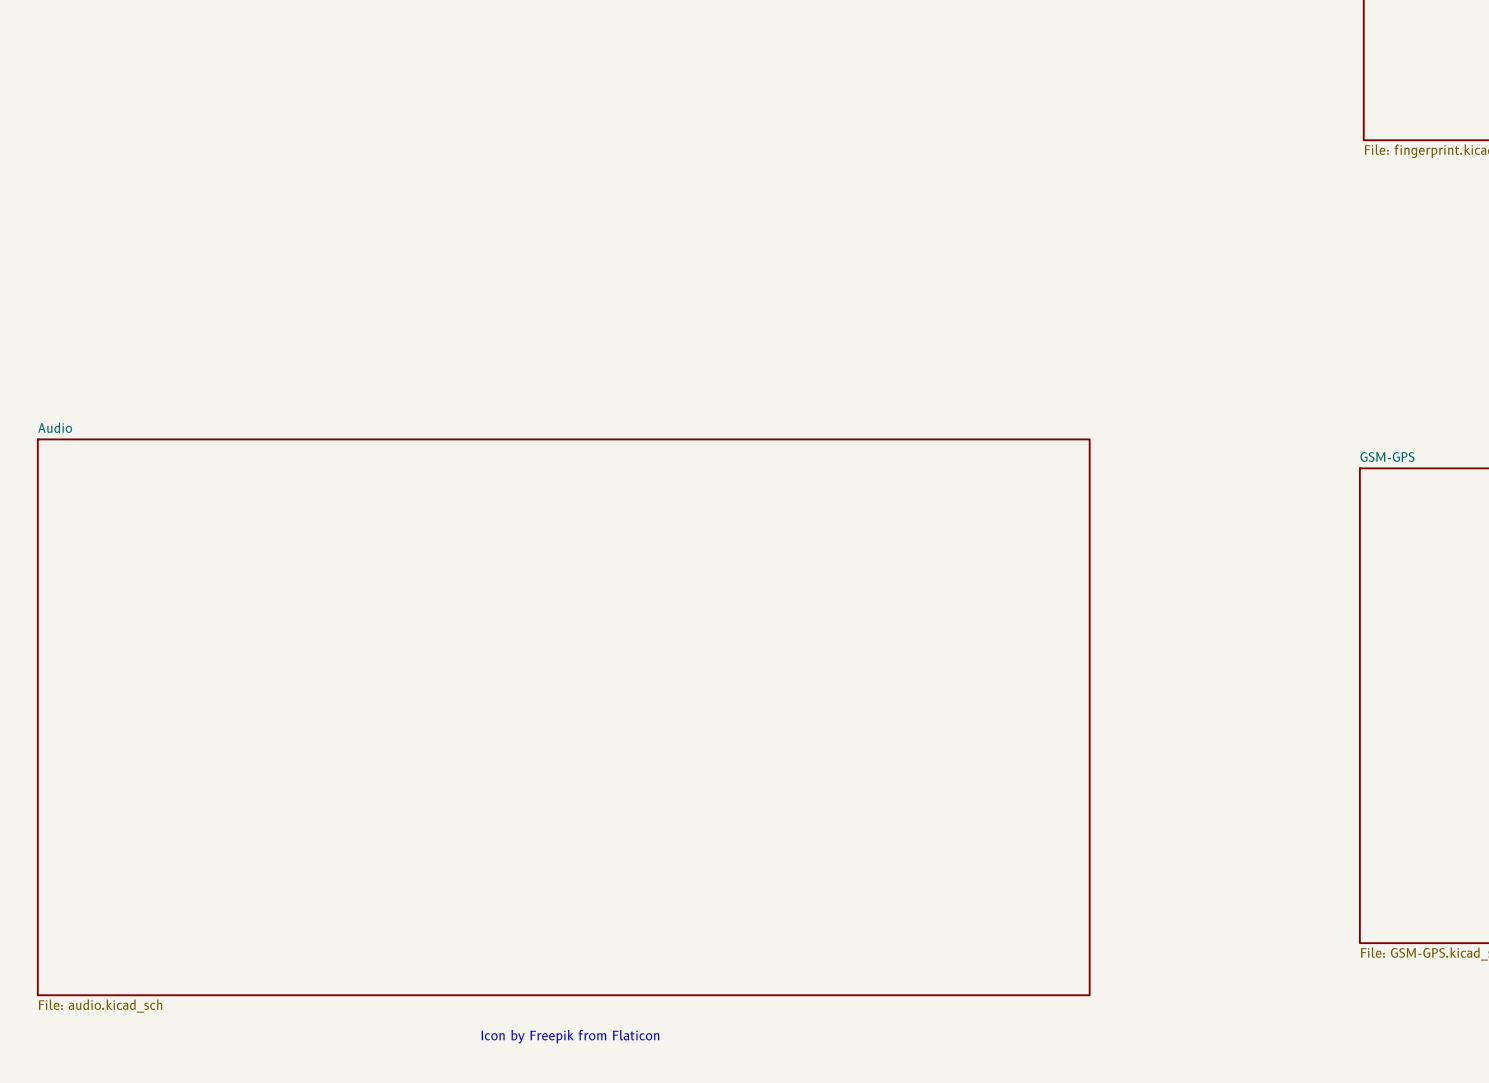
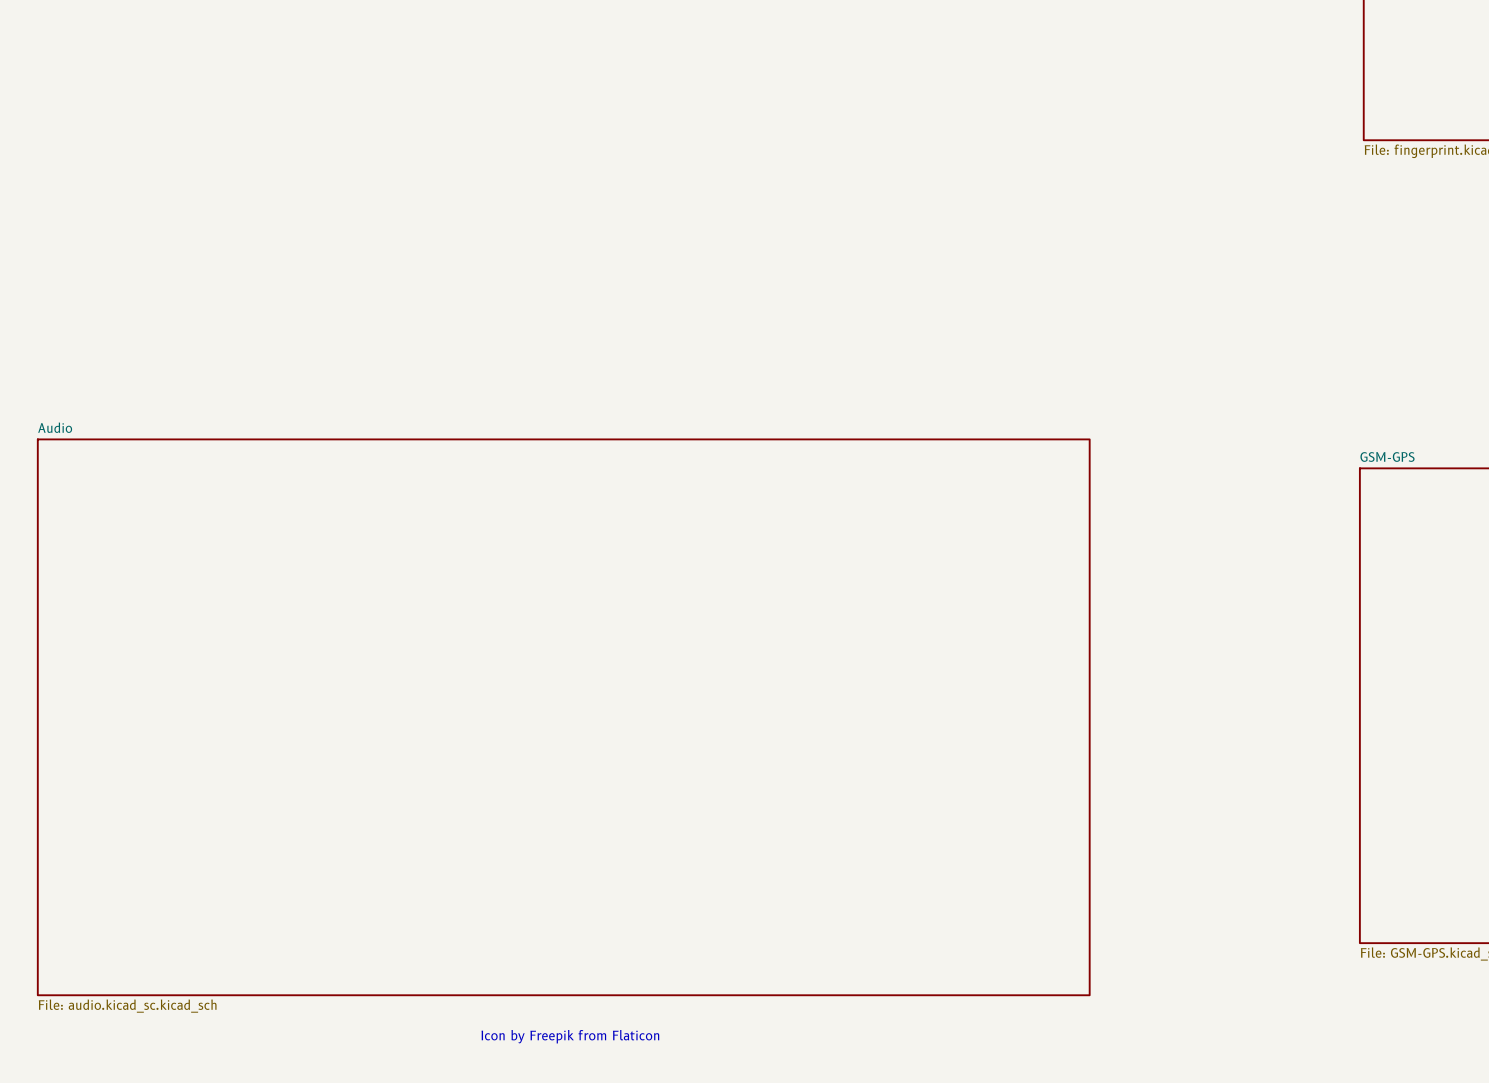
sheet Audio value: File: audio.kicad_sch (100, 1006) -> File: audio.kicad_sc.kicad_sch (127, 1006)

